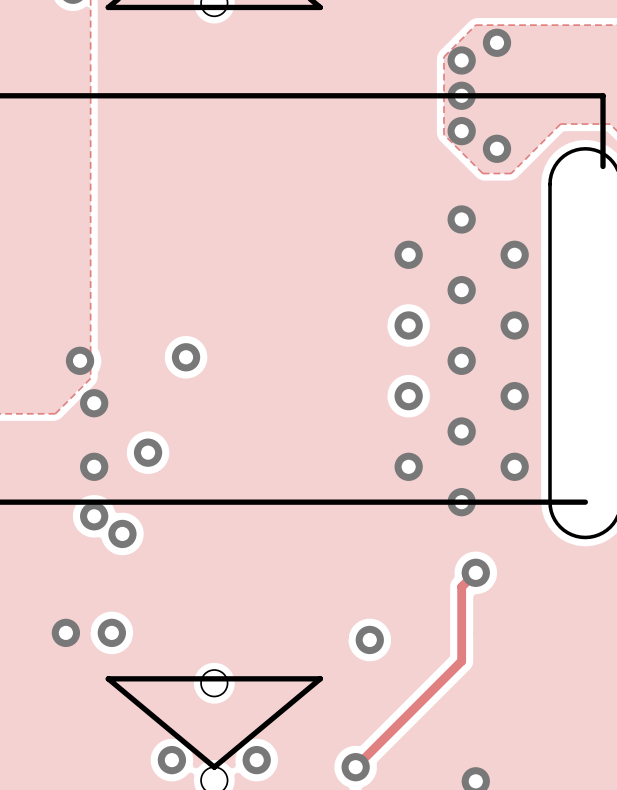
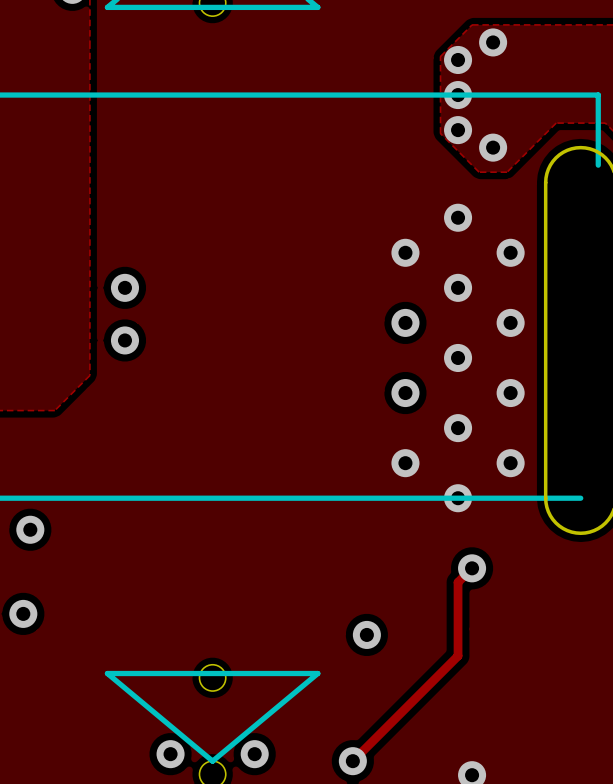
via: none -> (124, 287)
via: none -> (124, 340)
via: (186, 357) -> none
via: (80, 360) -> none
via: (94, 403) -> none
via: (148, 452) -> none
via: (94, 466) -> none
via: (94, 516) -> none
via: none -> (30, 529)
via: (122, 533) -> none
via: none -> (23, 613)
via: (65, 632) -> none
via: (111, 632) -> none

